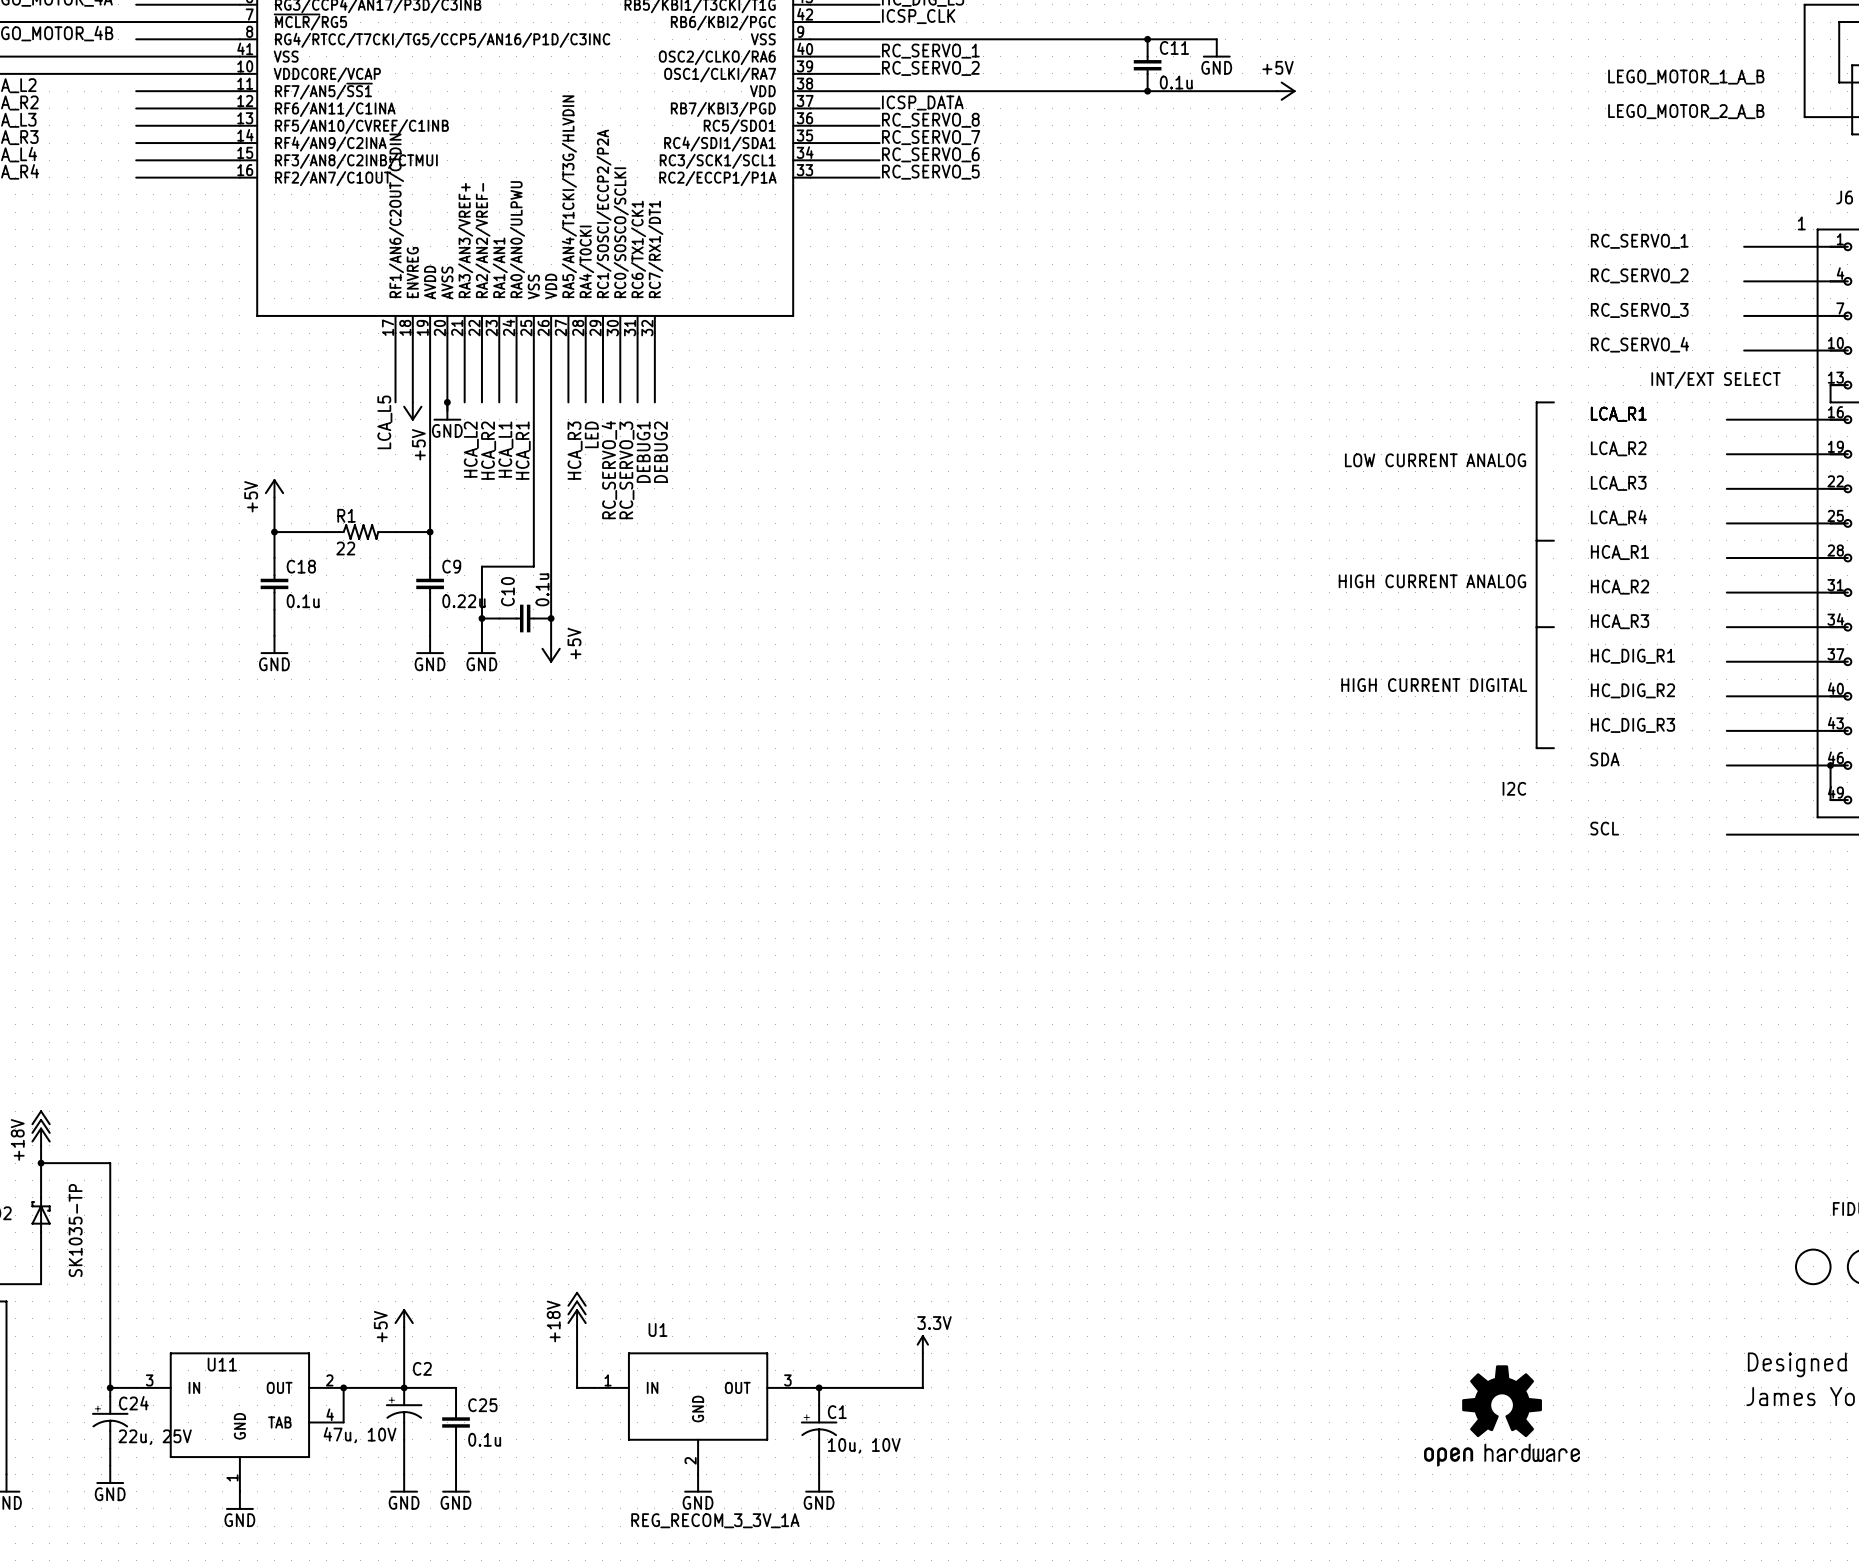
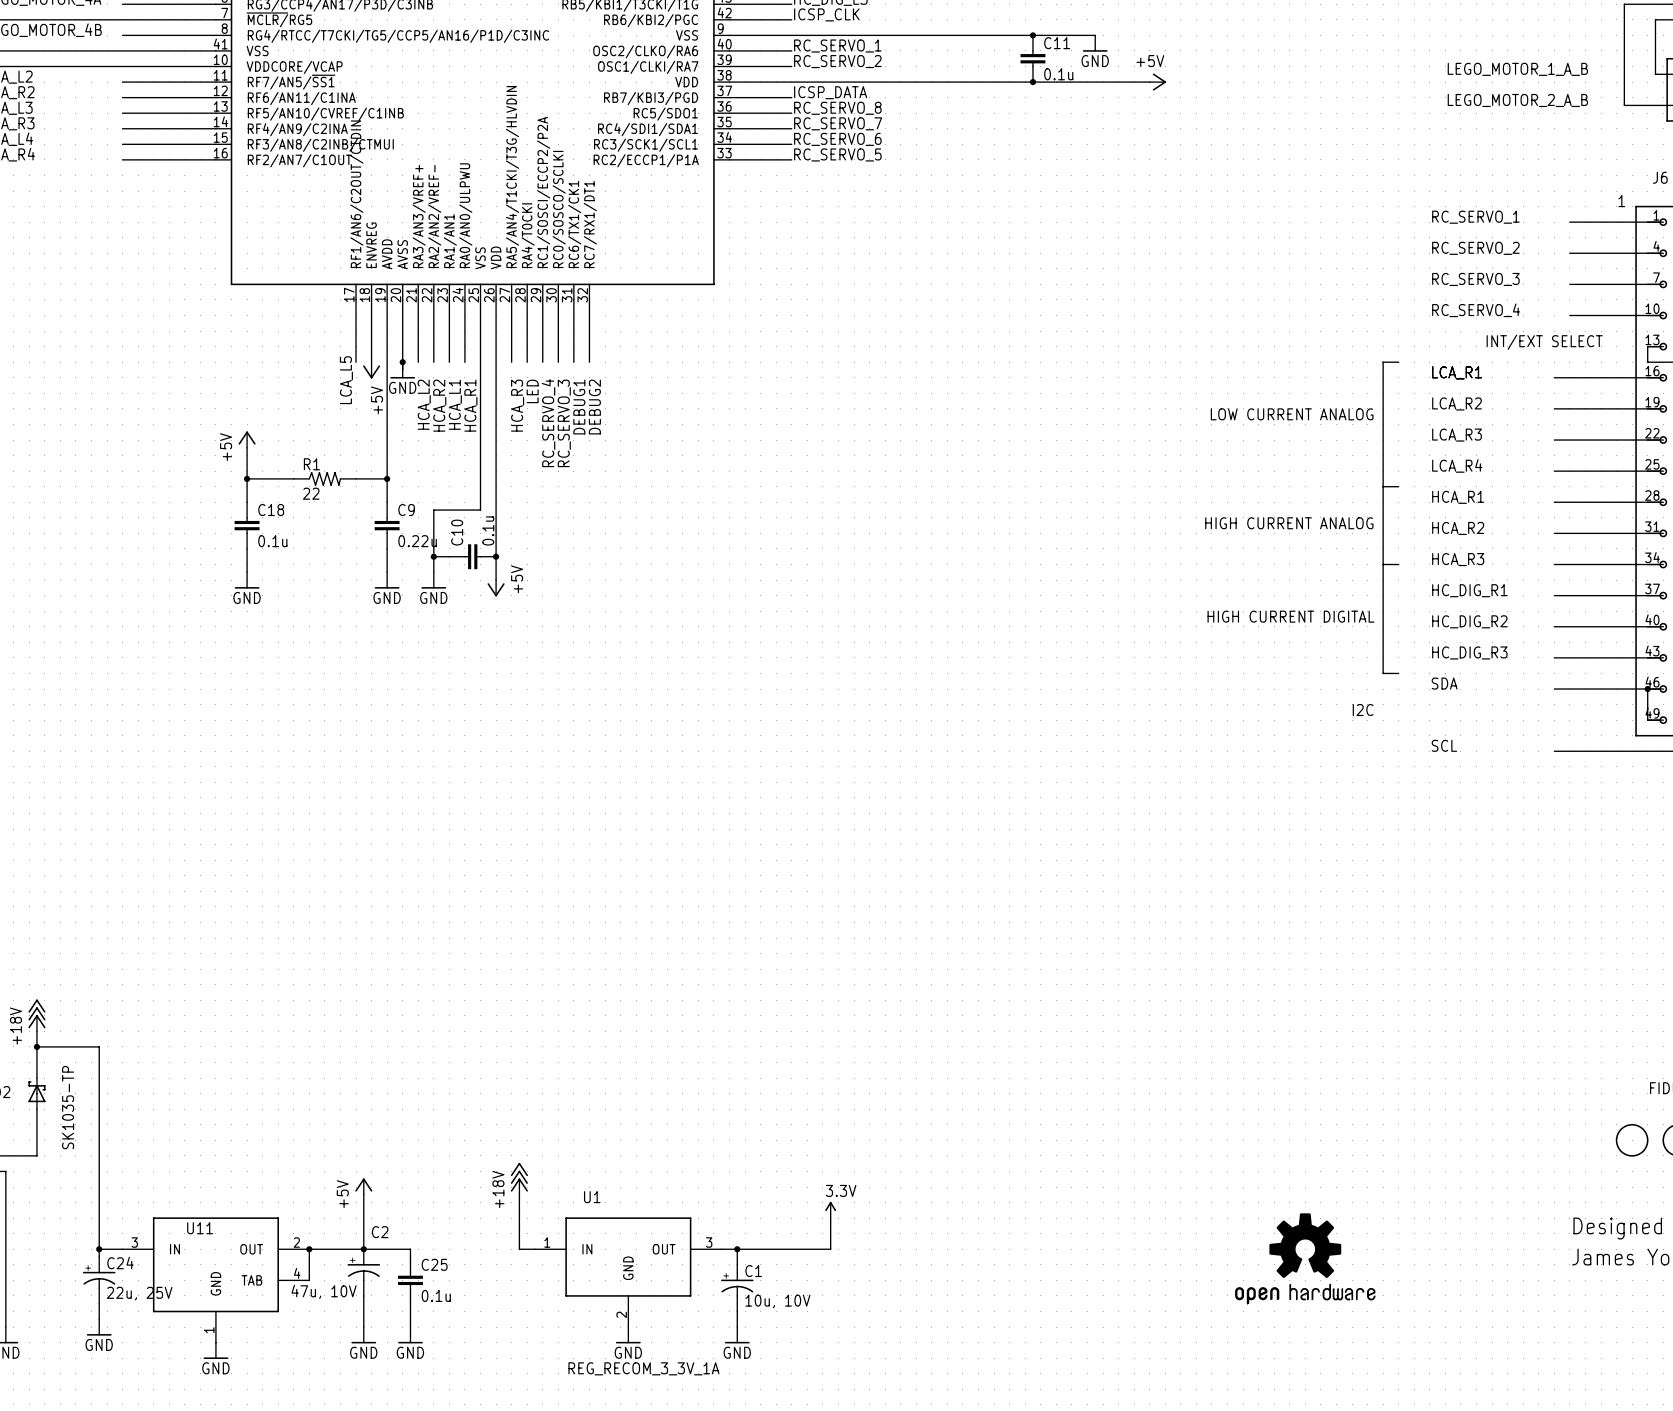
part position: (1502, 1415) -> (1305, 1258)

